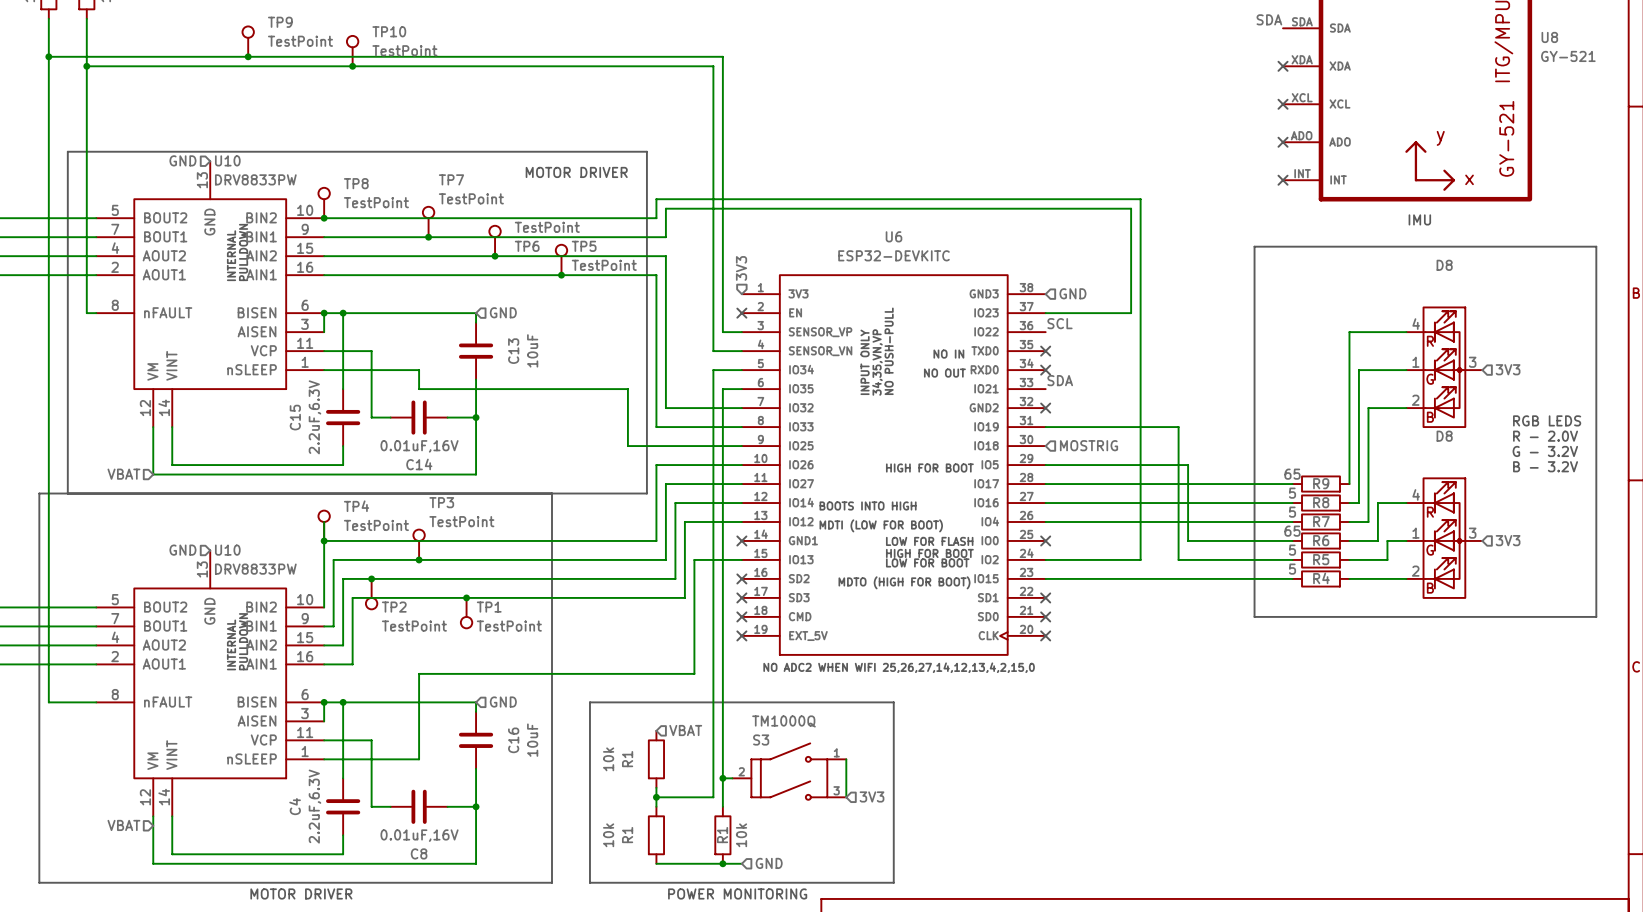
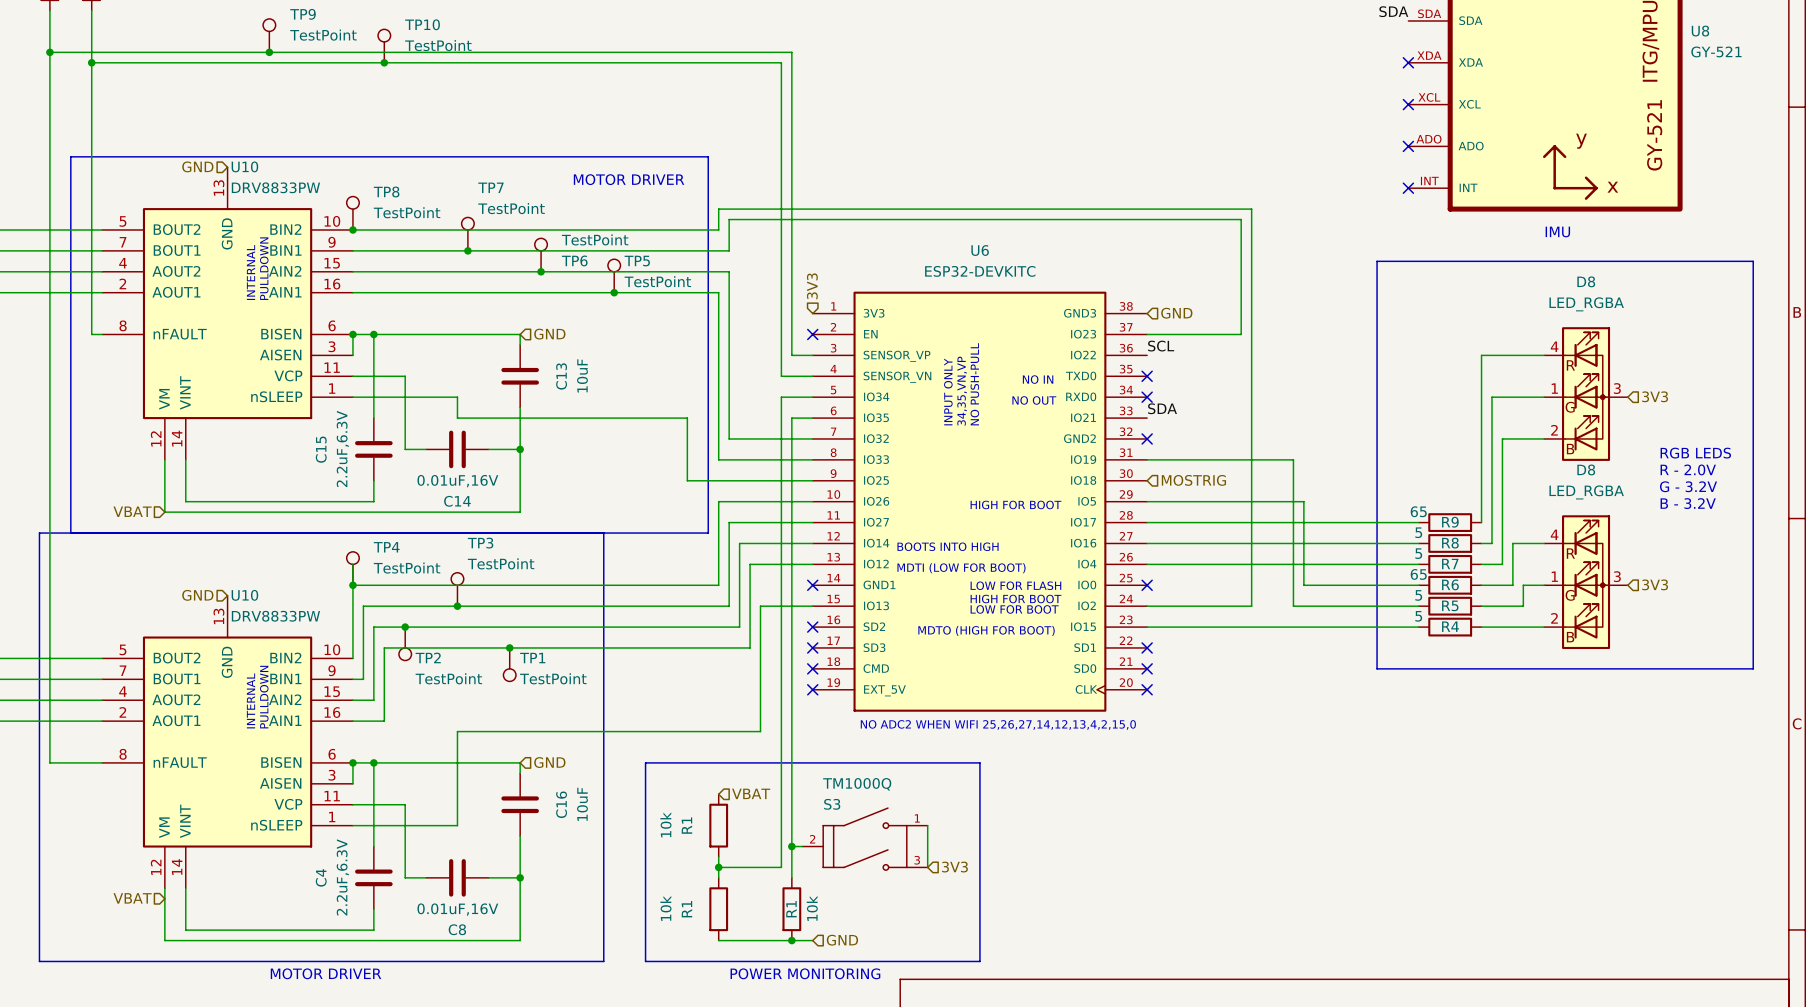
D8 value: none -> LED_RGBA (1586, 304)
D8 value: none -> LED_RGBA (1586, 492)

